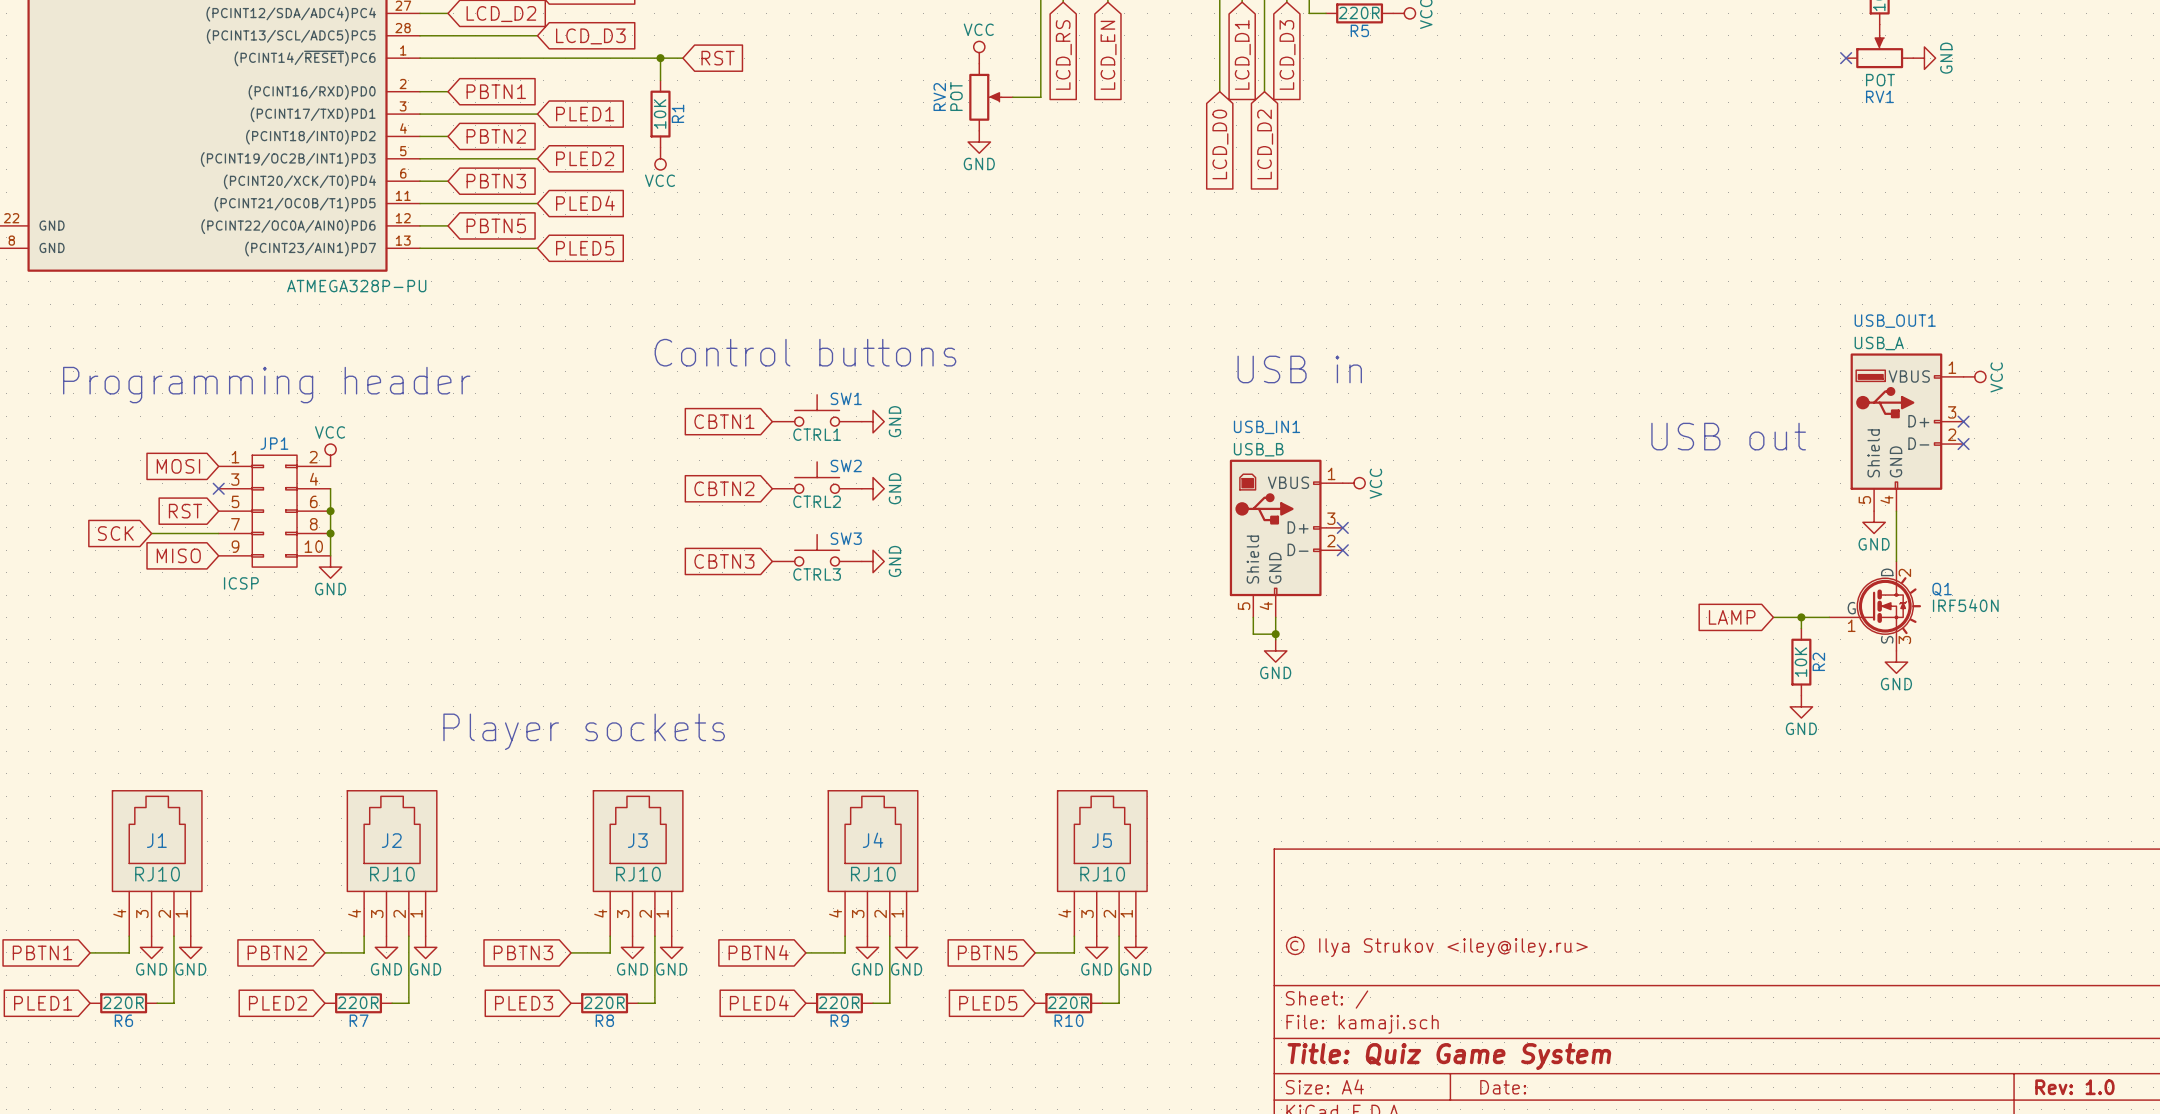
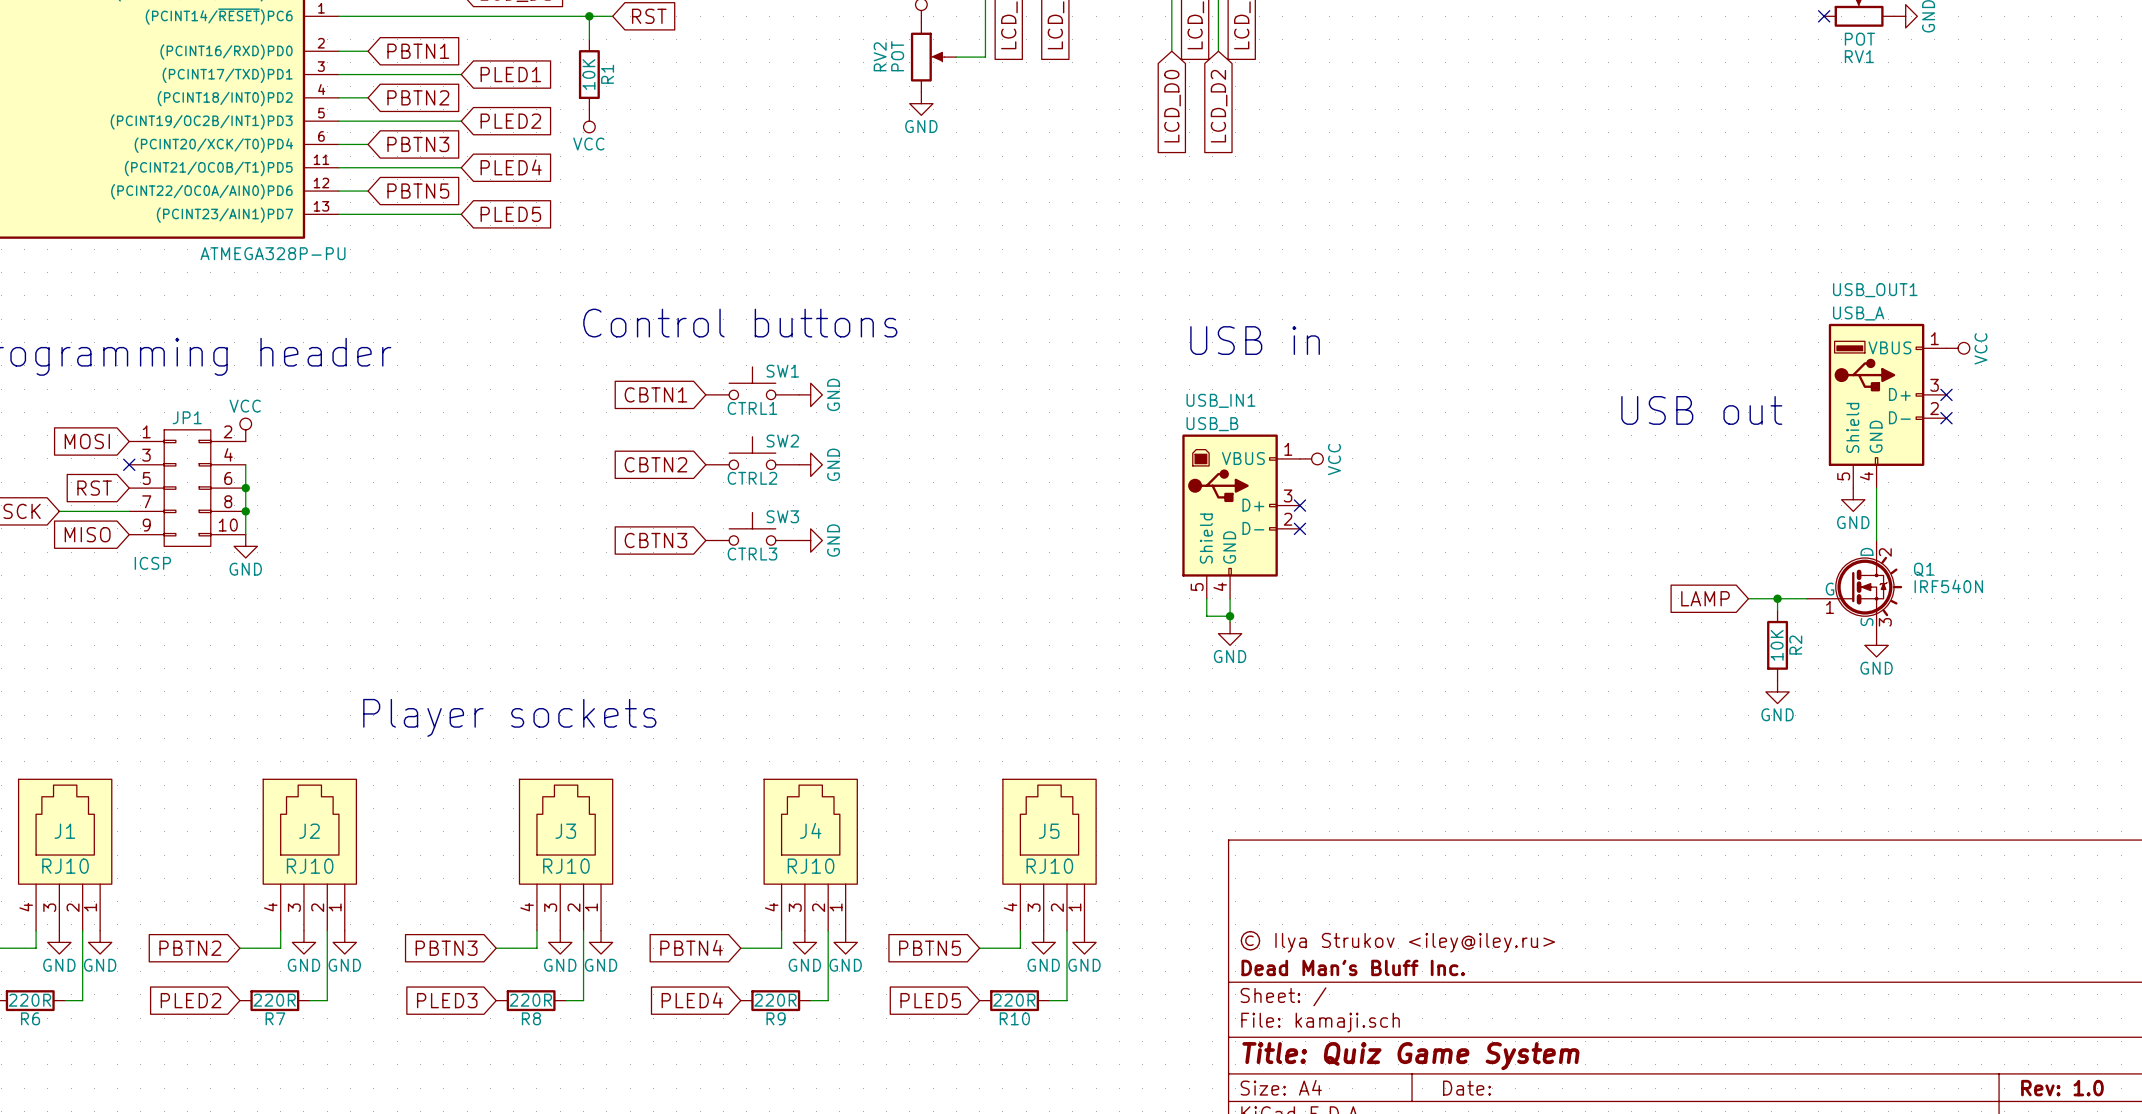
title block: none -> Dead Man's Bluff Inc. (1353, 967)

